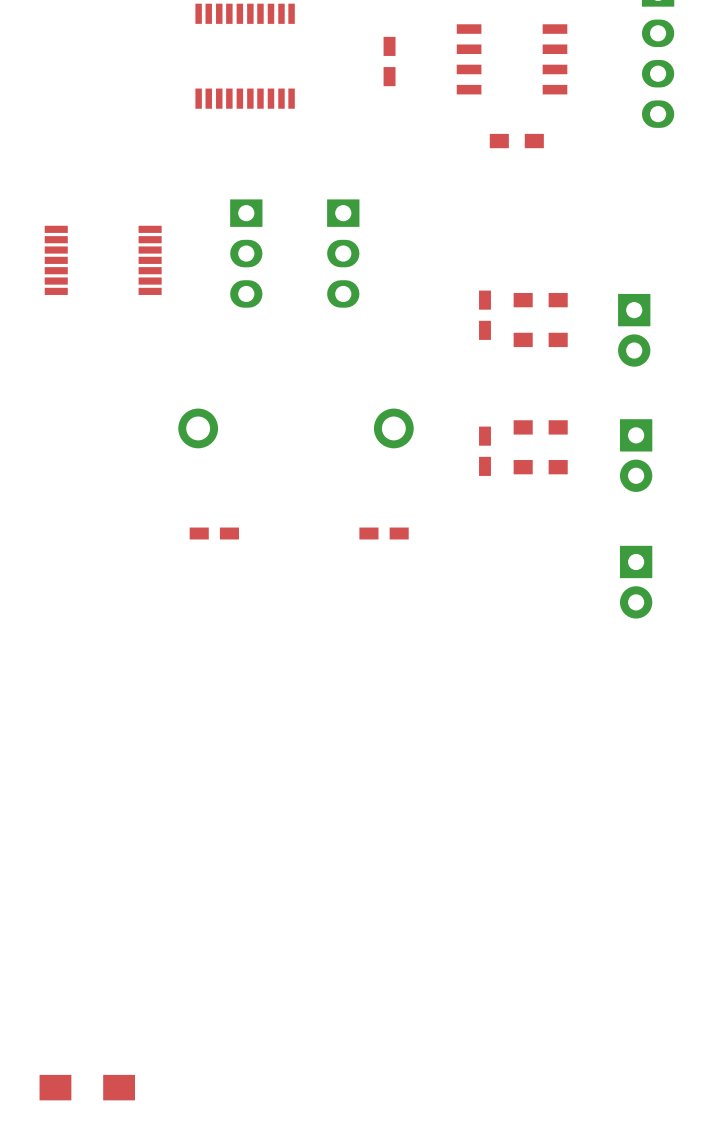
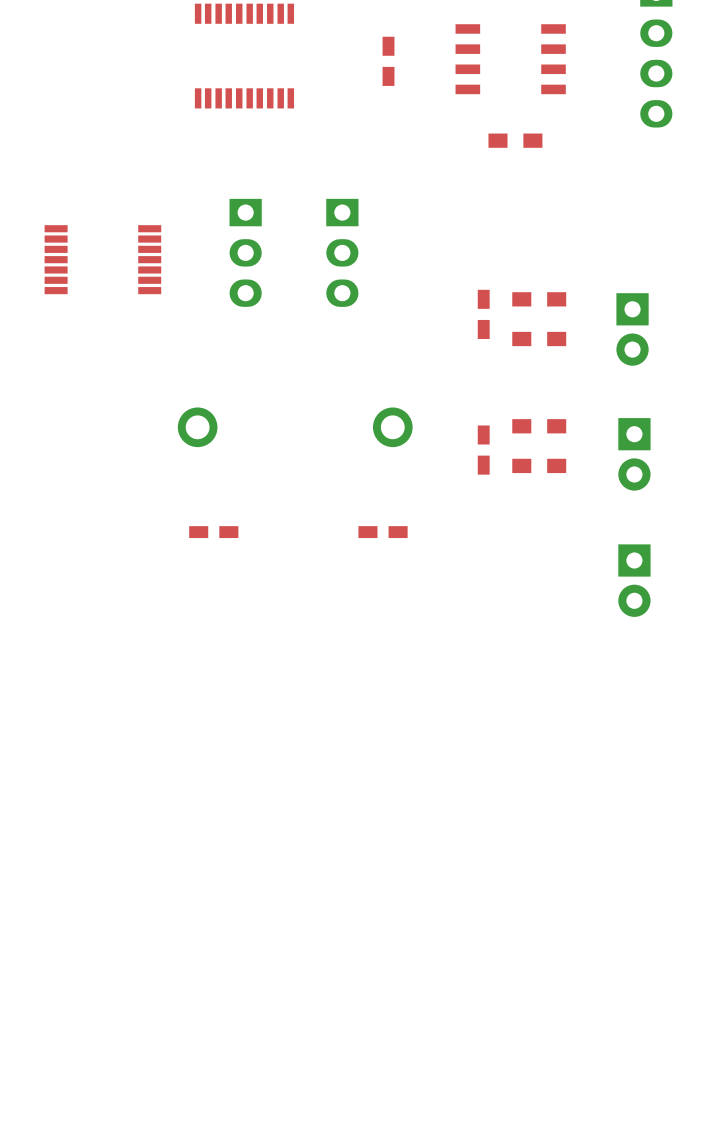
part: (87, 1087) -> none

